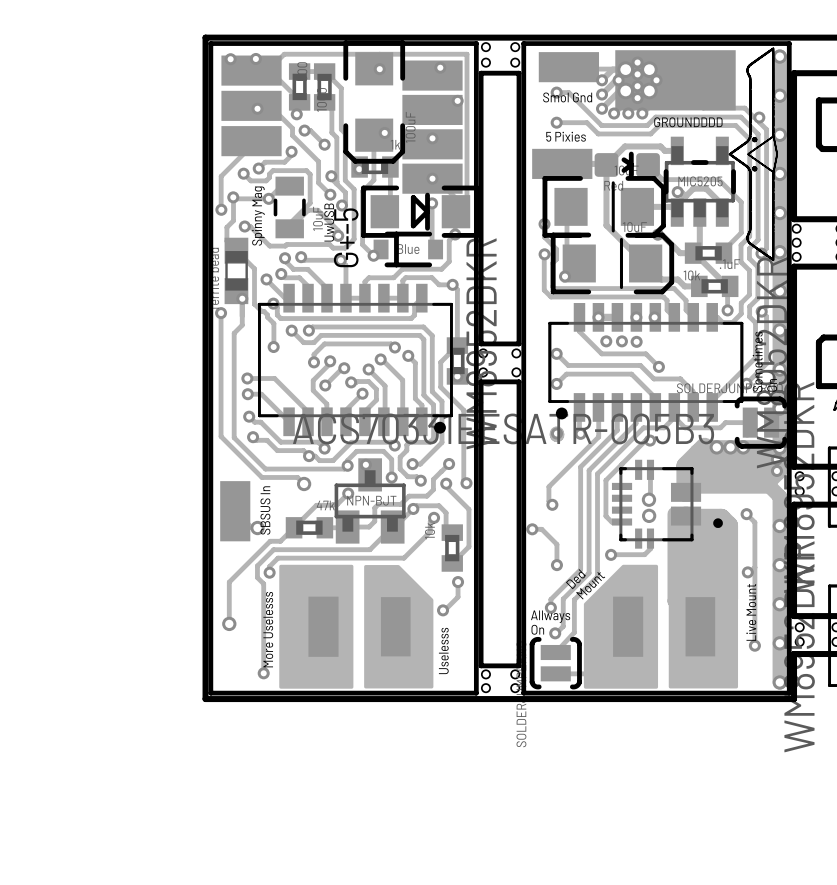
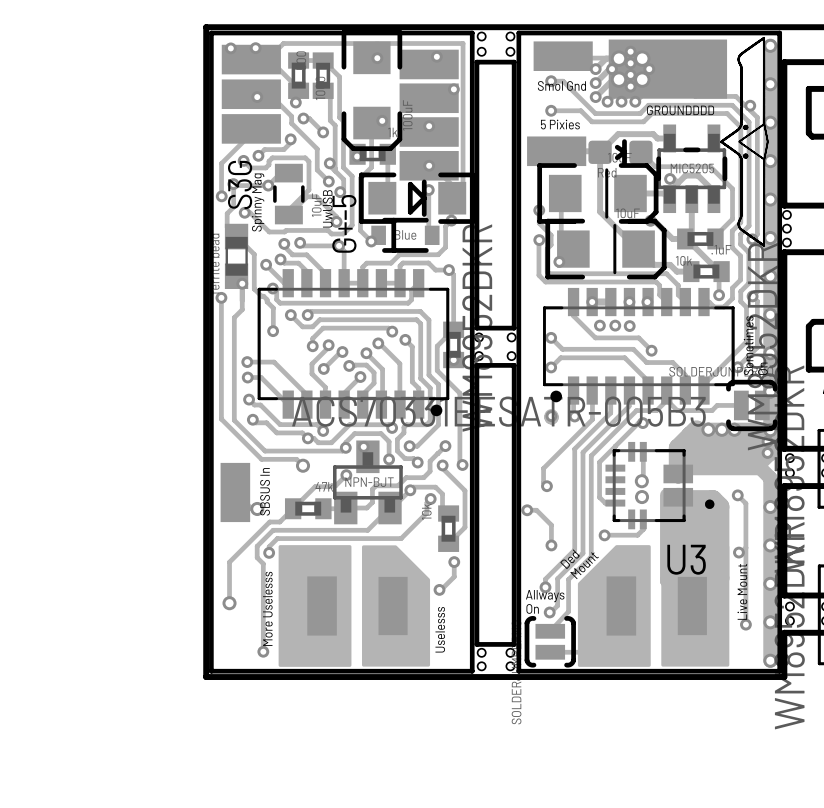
text: none -> S3G (240, 185)
U3 name: none -> U3 (686, 559)

